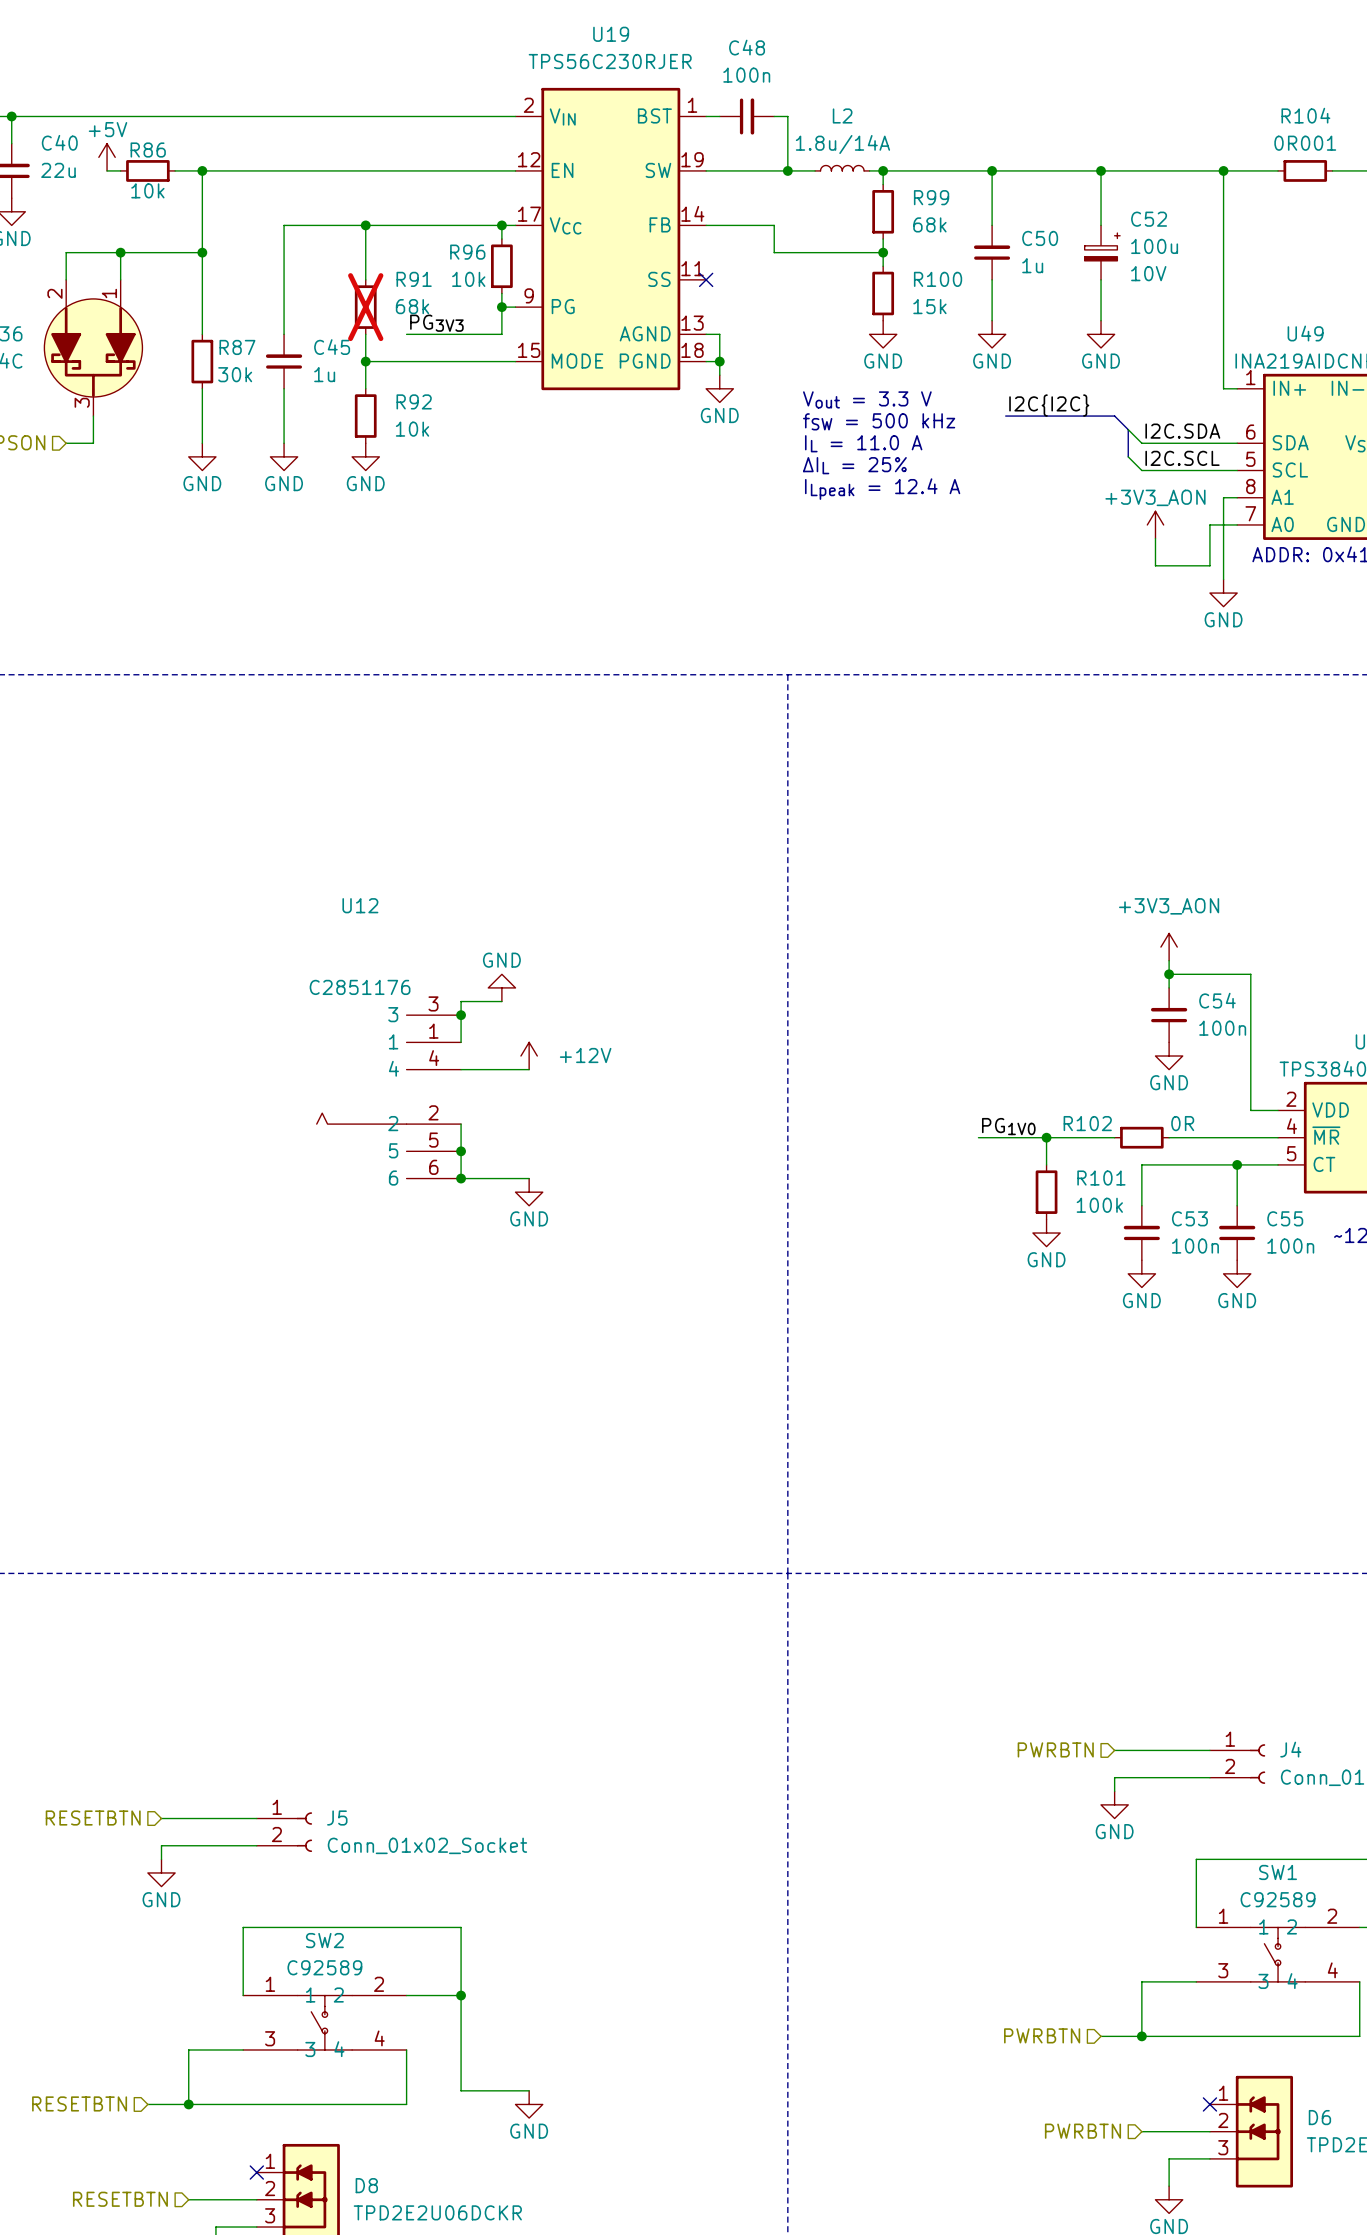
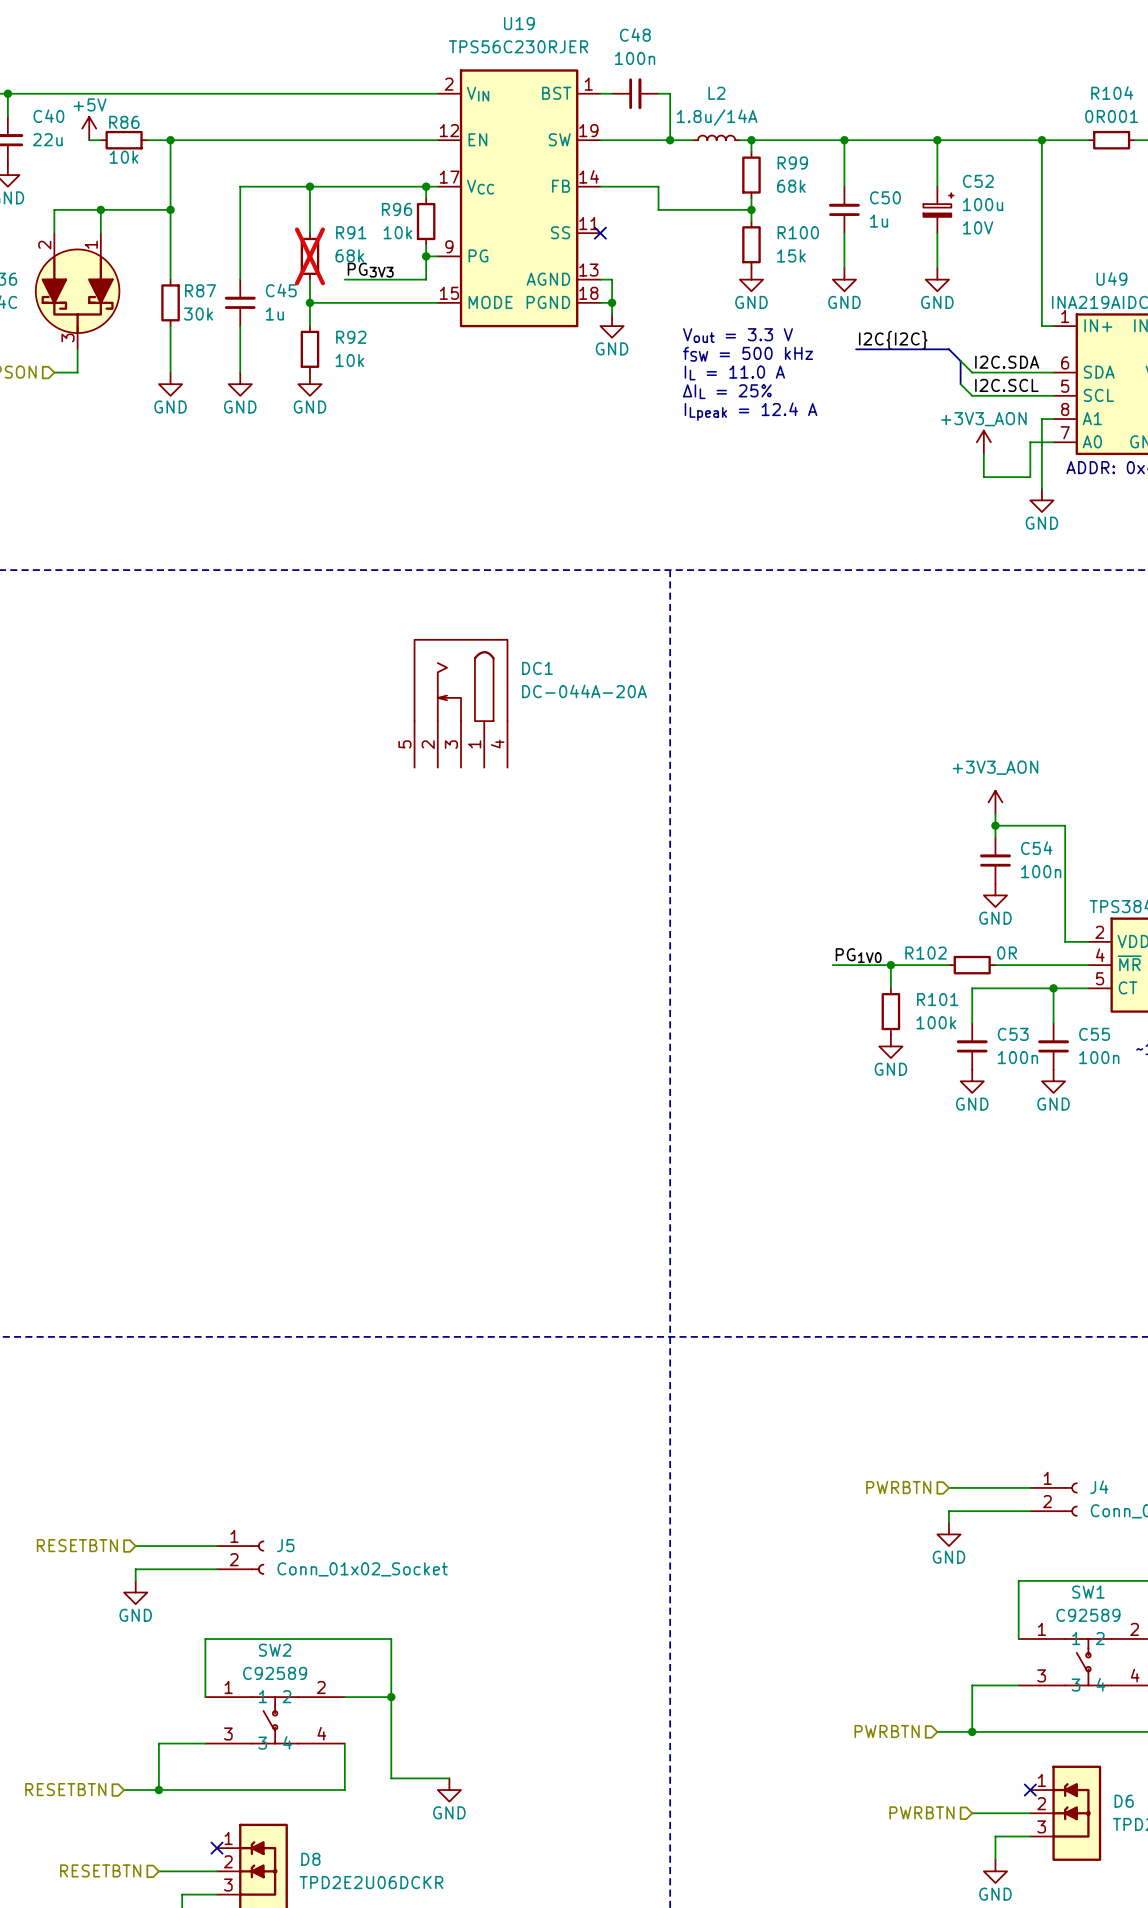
DC1: none -> DC-044A-20A (461, 703)
power symbol: GND (501, 987) -> none
wire: (501, 1001) (461, 1001) (461, 1042) -> none
junction: (461, 1015) -> none
power symbol: +12V (529, 1056) -> none
wire: (461, 1069) (529, 1069) -> none
U12: (388, 1096) -> none
wire: (461, 1124) (461, 1178) (529, 1178) -> none
junction: (461, 1151) -> none
junction: (461, 1178) -> none
power symbol: GND (529, 1192) -> none

